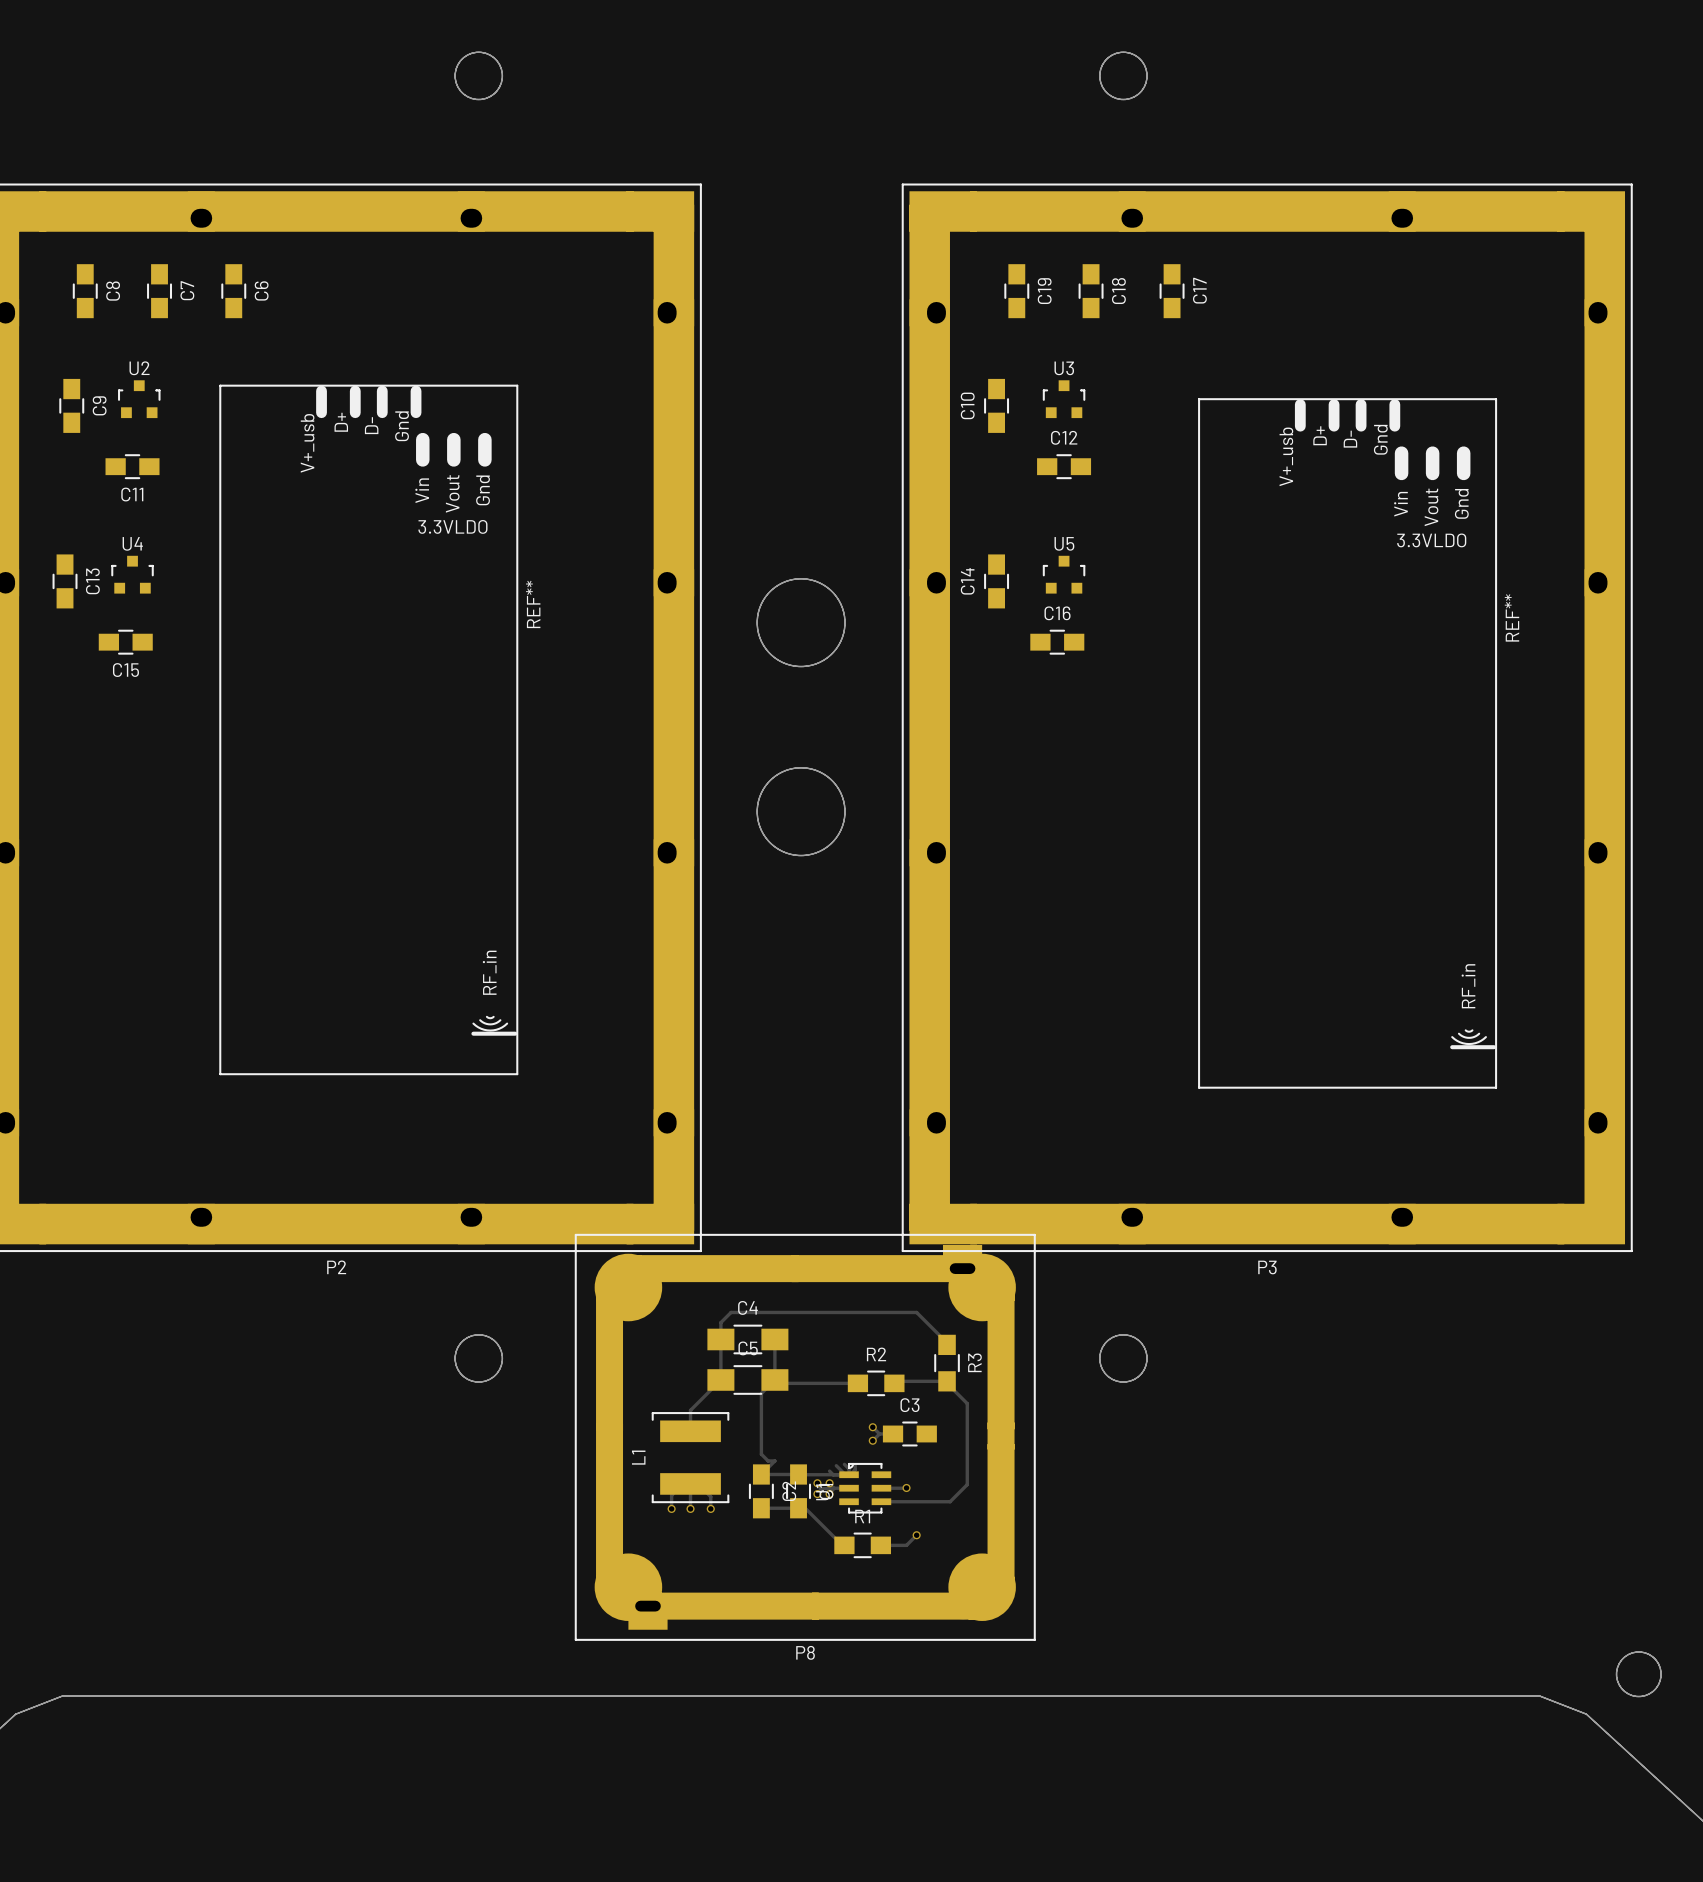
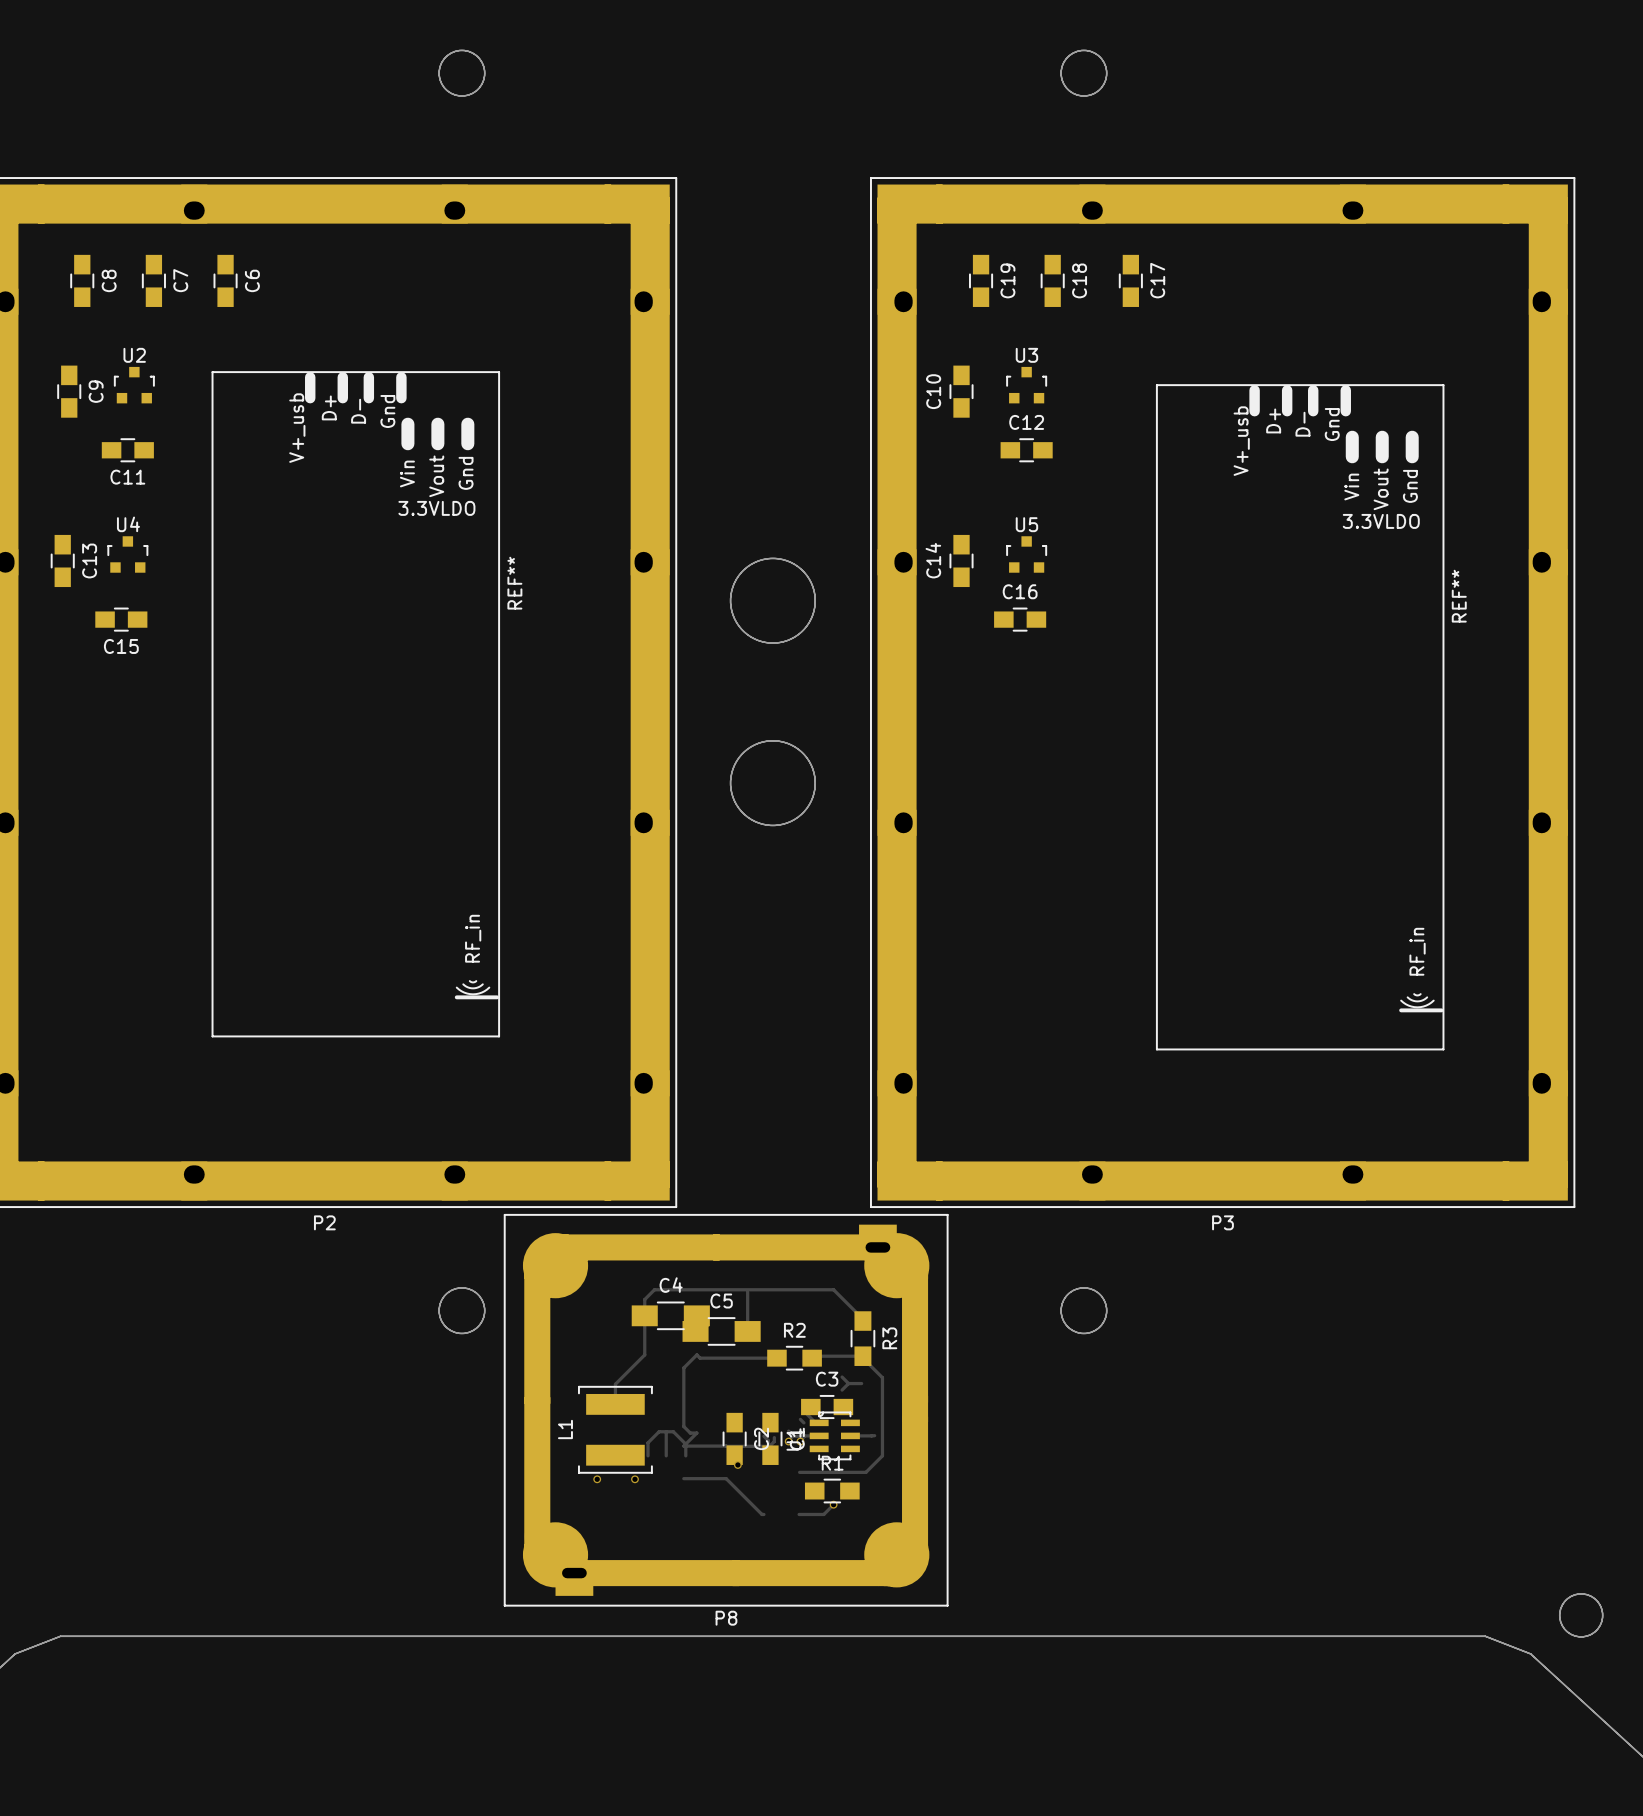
C4 position: (747, 1339) -> (670, 1315)
track: (947, 1344) (916, 1312) (731, 1312) (720, 1322) (720, 1379) (690, 1410) (690, 1431) -> (862, 1321) (833, 1289) (654, 1289) (644, 1299) (644, 1354) (615, 1384) (615, 1404)
R3 position: (947, 1363) -> (862, 1338)
track: (857, 1383) (778, 1383) (774, 1379) (761, 1393) (761, 1454) (768, 1460) (774, 1460) (761, 1474) (850, 1474) (855, 1469) (855, 1465) -> (776, 1358) (700, 1358) (696, 1354) (683, 1367) (683, 1426) (690, 1433) (696, 1433) (683, 1446) (769, 1446) (774, 1441) (774, 1437)
R2 position: (876, 1383) -> (794, 1358)
track: (894, 1383) (896, 1381) (947, 1381) (967, 1403) (967, 1484) (950, 1501) (881, 1501) -> (812, 1358) (814, 1356) (862, 1356) (882, 1377) (882, 1455) (865, 1472) (799, 1472)
via: (872, 1427) -> none
C3 position: (909, 1433) -> (827, 1407)
P8 position: (805, 1437) -> (726, 1410)
via: (872, 1440) -> none
L1 position: (690, 1457) -> (615, 1429)
track: (844, 1464) (849, 1468) (849, 1474) -> (763, 1436) (768, 1440) (768, 1446)
via: (817, 1483) -> none
via: (829, 1483) -> none
via: (906, 1487) -> none
via: (671, 1508) -> none
via: (690, 1508) -> none
via: (710, 1508) -> none
track: (761, 1508) (805, 1508) (844, 1545) -> (683, 1478) (726, 1478) (763, 1514)
via: none -> (737, 1464)
via: none -> (597, 1479)
via: none -> (634, 1479)
track: (916, 1535) (906, 1545) (880, 1545) -> (833, 1504) (823, 1514) (799, 1514)
via: (916, 1535) -> none
via: none -> (833, 1504)

